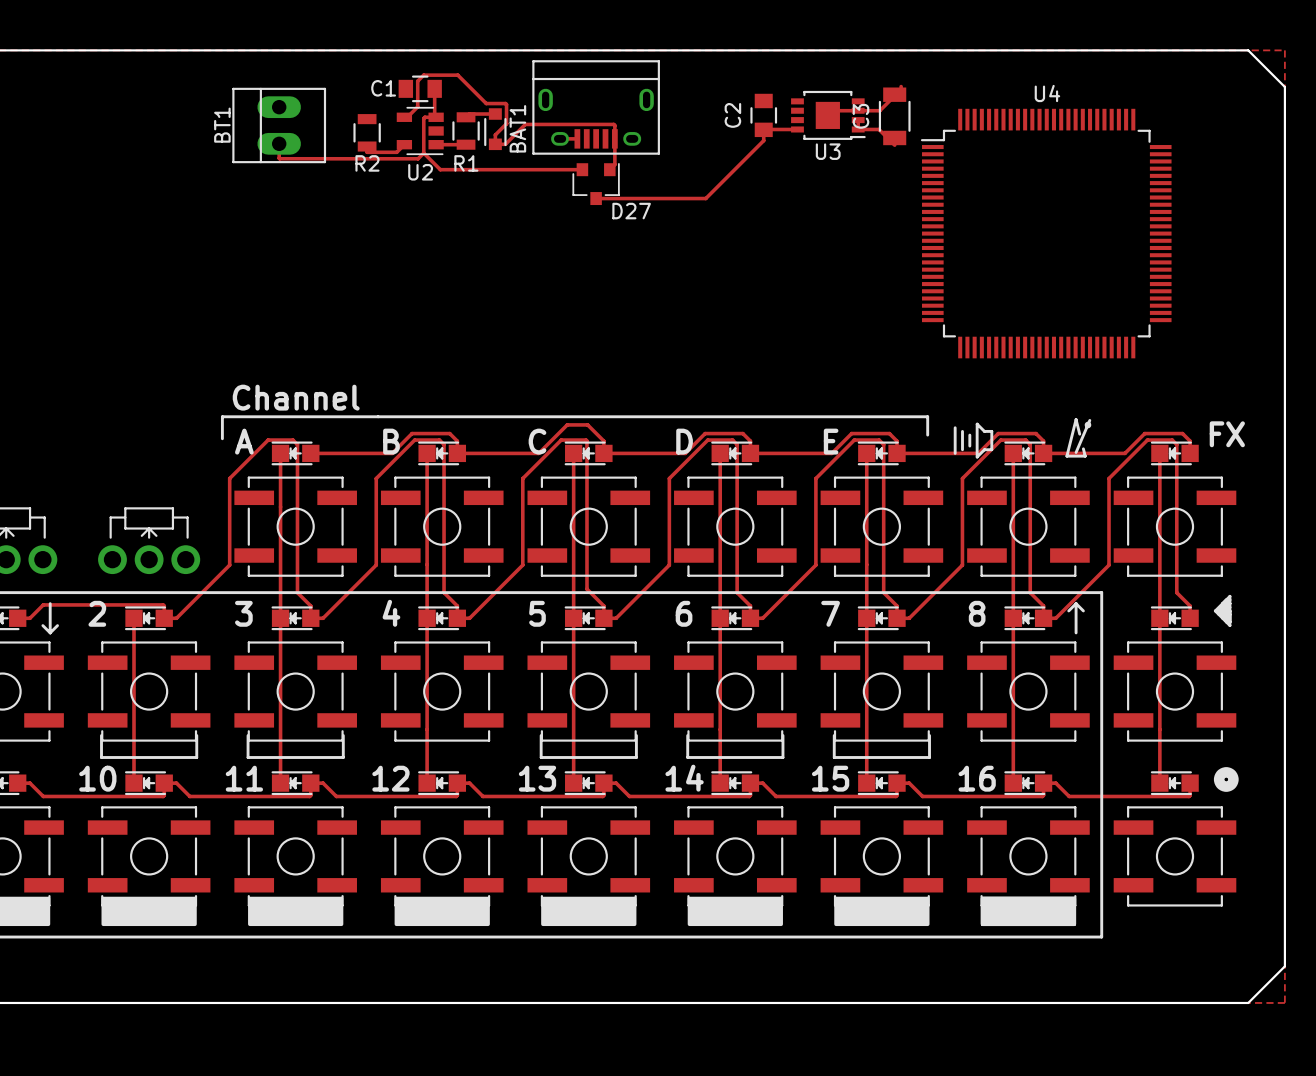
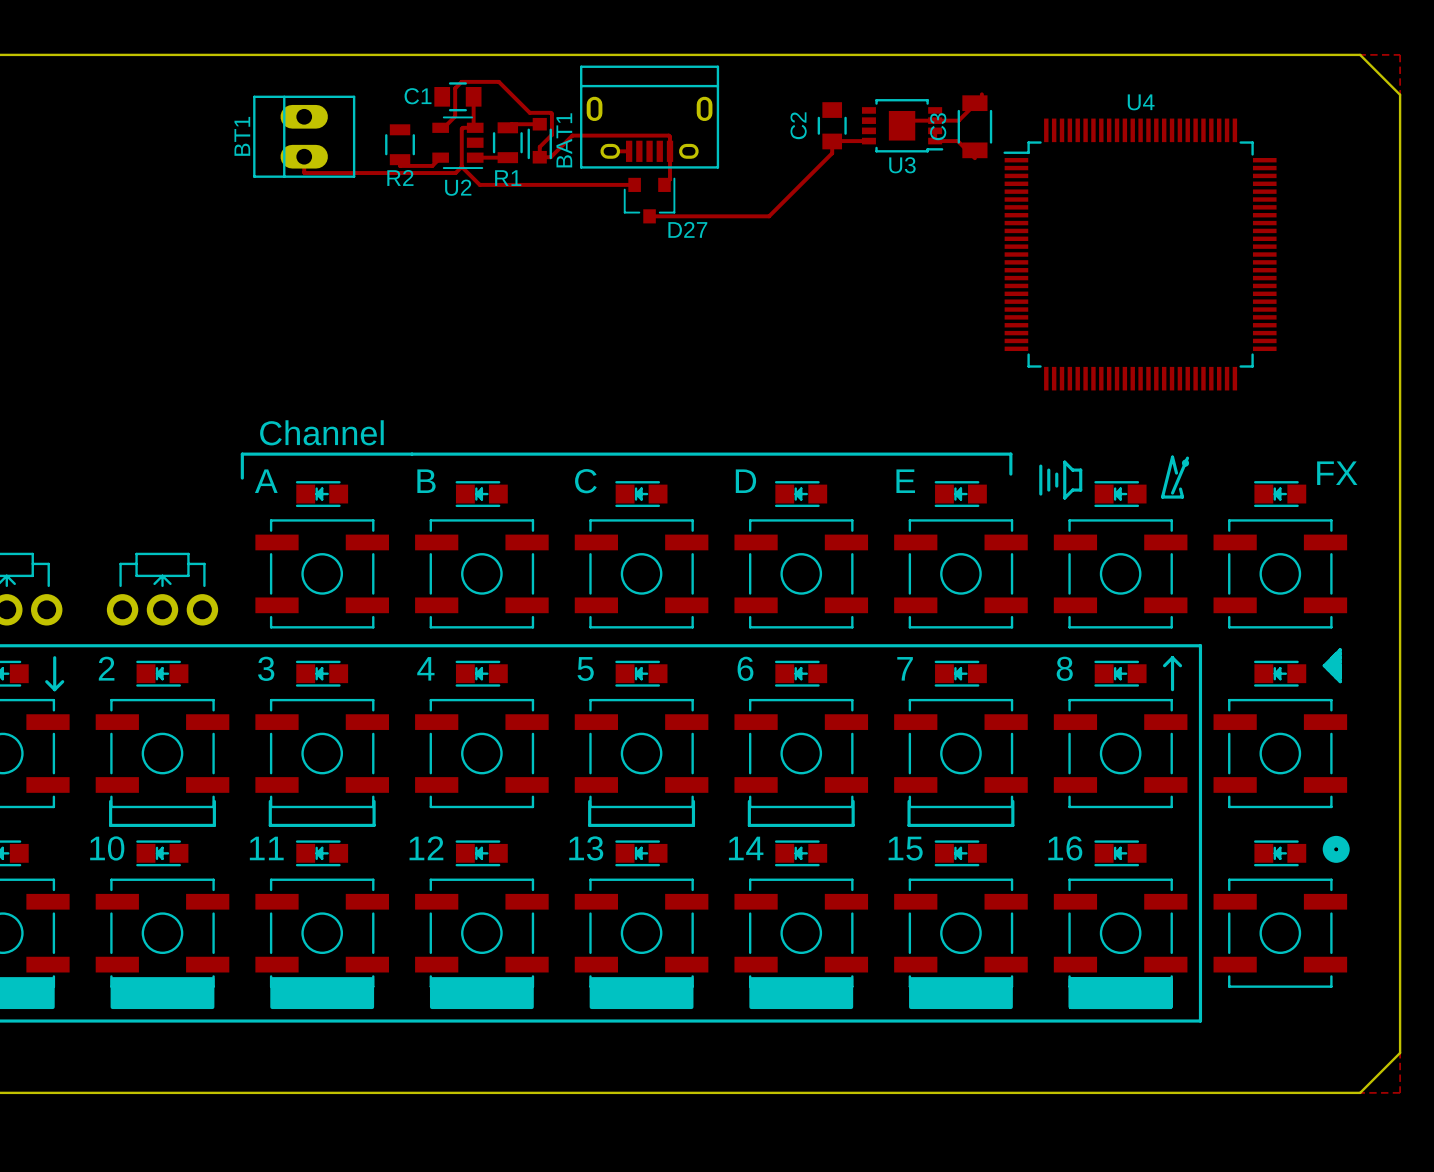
track: (280, 453) (280, 783) -> none
track: (310, 453) (392, 453) (412, 433) (449, 433) (457, 441) (457, 453) (538, 453) (567, 424) (587, 424) (603, 441) (603, 453) (685, 453) (705, 433) (742, 433) (750, 441) (750, 453) (831, 453) (851, 433) (889, 433) (897, 441) (897, 453) (978, 453) (998, 433) (1036, 433) (1043, 441) (1043, 453) (1124, 453) (1144, 433) (1182, 433) (1190, 441) (1190, 453) -> none
track: (427, 453) (427, 783) -> none
track: (573, 453) (573, 783) -> none
track: (720, 453) (720, 783) -> none
track: (866, 453) (866, 783) -> none
track: (1013, 453) (1013, 783) -> none
track: (1159, 453) (1159, 783) -> none
track: (17, 618) (29, 618) (43, 604) (163, 604) (164, 618) (176, 618) (229, 565) (229, 478) (268, 440) (292, 440) (297, 444) (297, 592) (310, 606) (310, 618) (323, 618) (376, 565) (376, 478) (414, 440) (439, 440) (444, 444) (444, 592) (457, 606) (457, 618) (469, 618) (522, 565) (522, 478) (561, 440) (586, 441) (586, 589) (603, 606) (603, 618) (616, 618) (669, 565) (669, 478) (707, 440) (732, 440) (737, 444) (737, 592) (750, 606) (750, 618) (762, 618) (815, 565) (815, 478) (854, 440) (879, 440) (883, 444) (883, 592) (897, 606) (897, 618) (909, 618) (962, 565) (962, 478) (1000, 440) (1025, 440) (1030, 444) (1030, 592) (1043, 606) (1043, 618) (1055, 618) (1109, 565) (1109, 478) (1147, 440) (1172, 440) (1176, 444) (1176, 592) (1190, 606) (1190, 618) -> none
track: (134, 618) (134, 783) -> none
track: (17, 783) (29, 783) (43, 796) (163, 796) (164, 783) (176, 783) (189, 796) (309, 796) (310, 783) (323, 783) (336, 796) (456, 796) (457, 783) (469, 783) (482, 796) (602, 796) (603, 783) (616, 783) (629, 796) (749, 796) (750, 783) (762, 783) (776, 796) (895, 796) (897, 783) (909, 783) (922, 796) (1042, 796) (1043, 783) (1055, 783) (1069, 796) (1189, 796) (1190, 783) -> none

